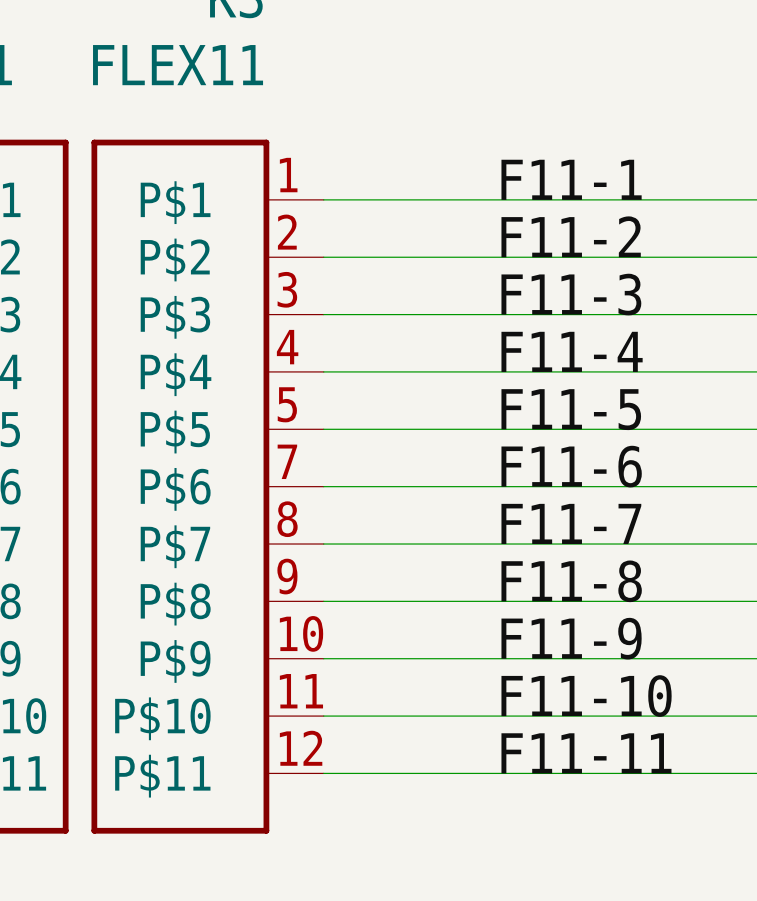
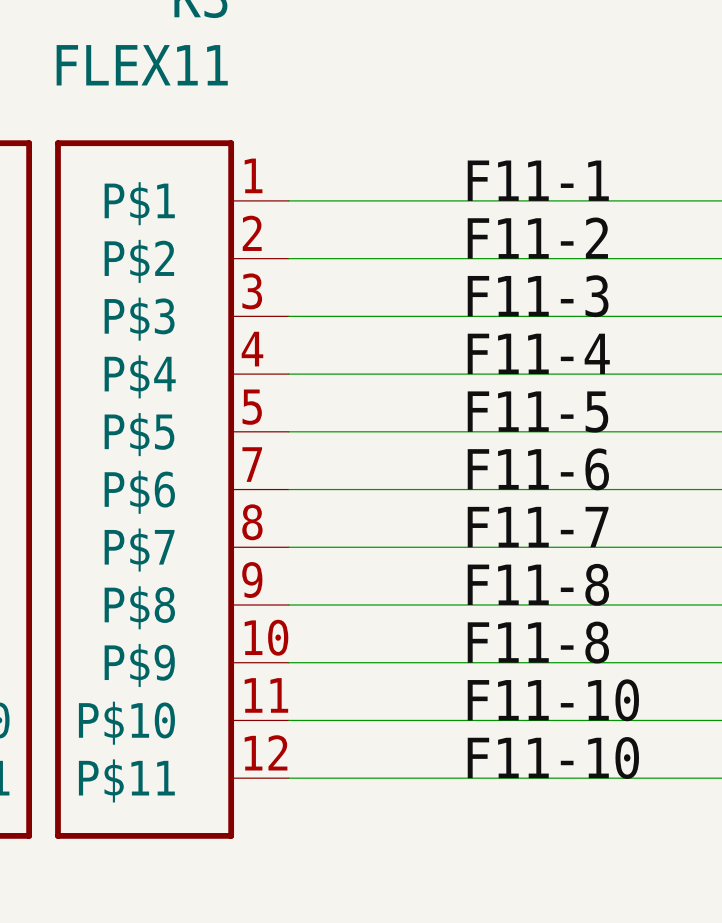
label: F11-9 (571, 638) -> F11-8 (538, 642)
label: F11-11 (586, 753) -> F11-10 (553, 758)

